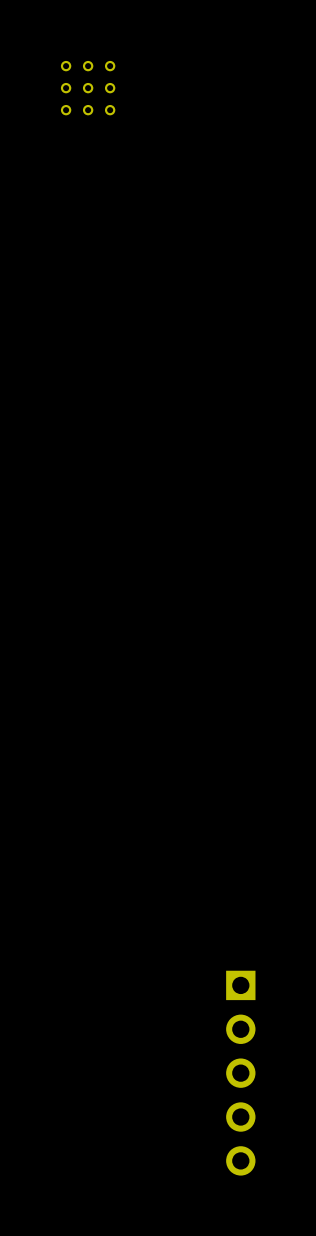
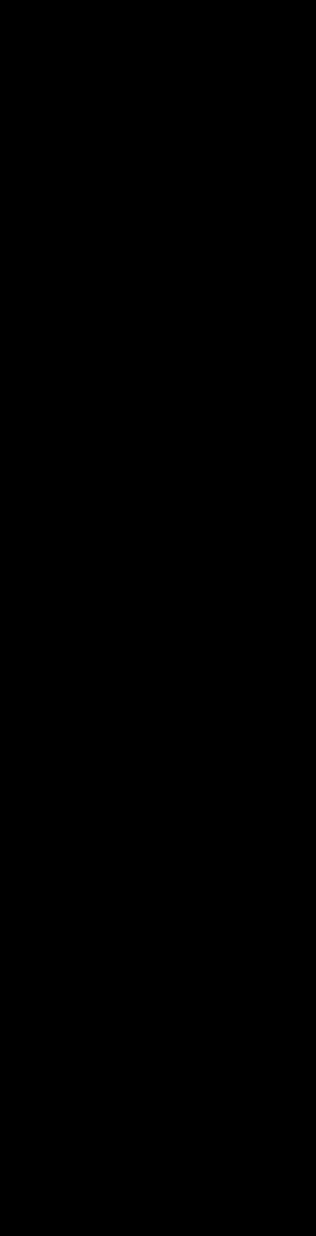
part: (88, 88) -> none
part: (240, 1073) -> none

